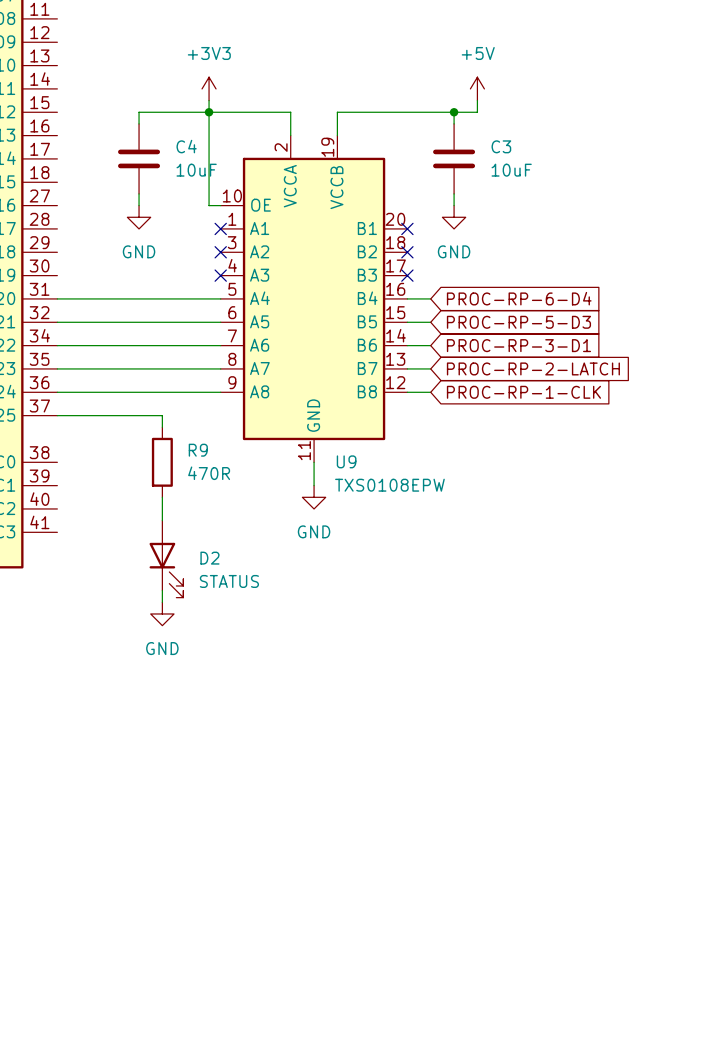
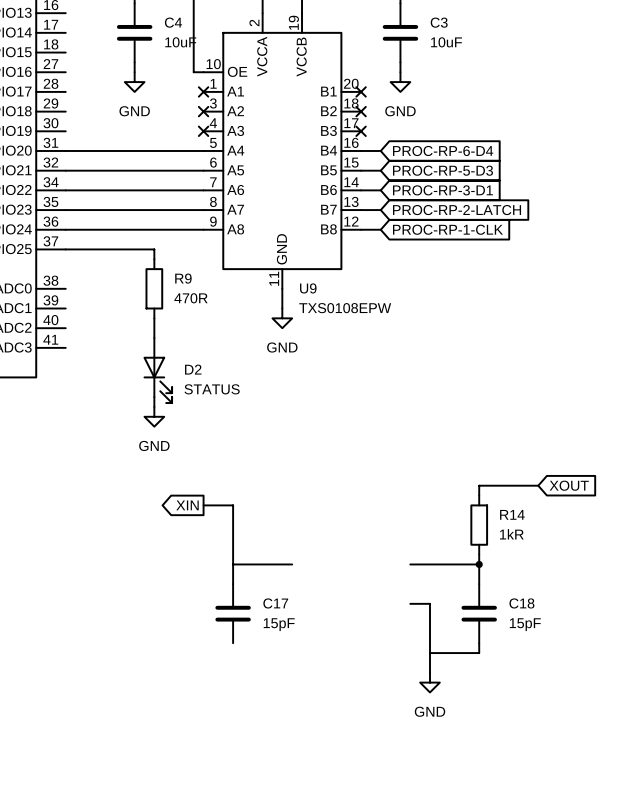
wire: none -> (538, 485) (479, 485) (479, 495)
global label: none -> XOUT (569, 485)
global label: none -> XIN (187, 505)
wire: none -> (203, 505) (233, 505) (233, 584)
R14: none -> 1kR (479, 525)
wire: none -> (479, 554) (479, 584)
wire: none -> (233, 564) (292, 564)
wire: none -> (410, 564) (479, 564)
junction: none -> (479, 564)
wire: none -> (410, 603) (429, 603) (429, 672)
C17: none -> 15pF (233, 613)
C18: none -> 15pF (479, 613)
wire: none -> (479, 643) (479, 653) (429, 653)
power symbol: none -> GND (429, 682)

